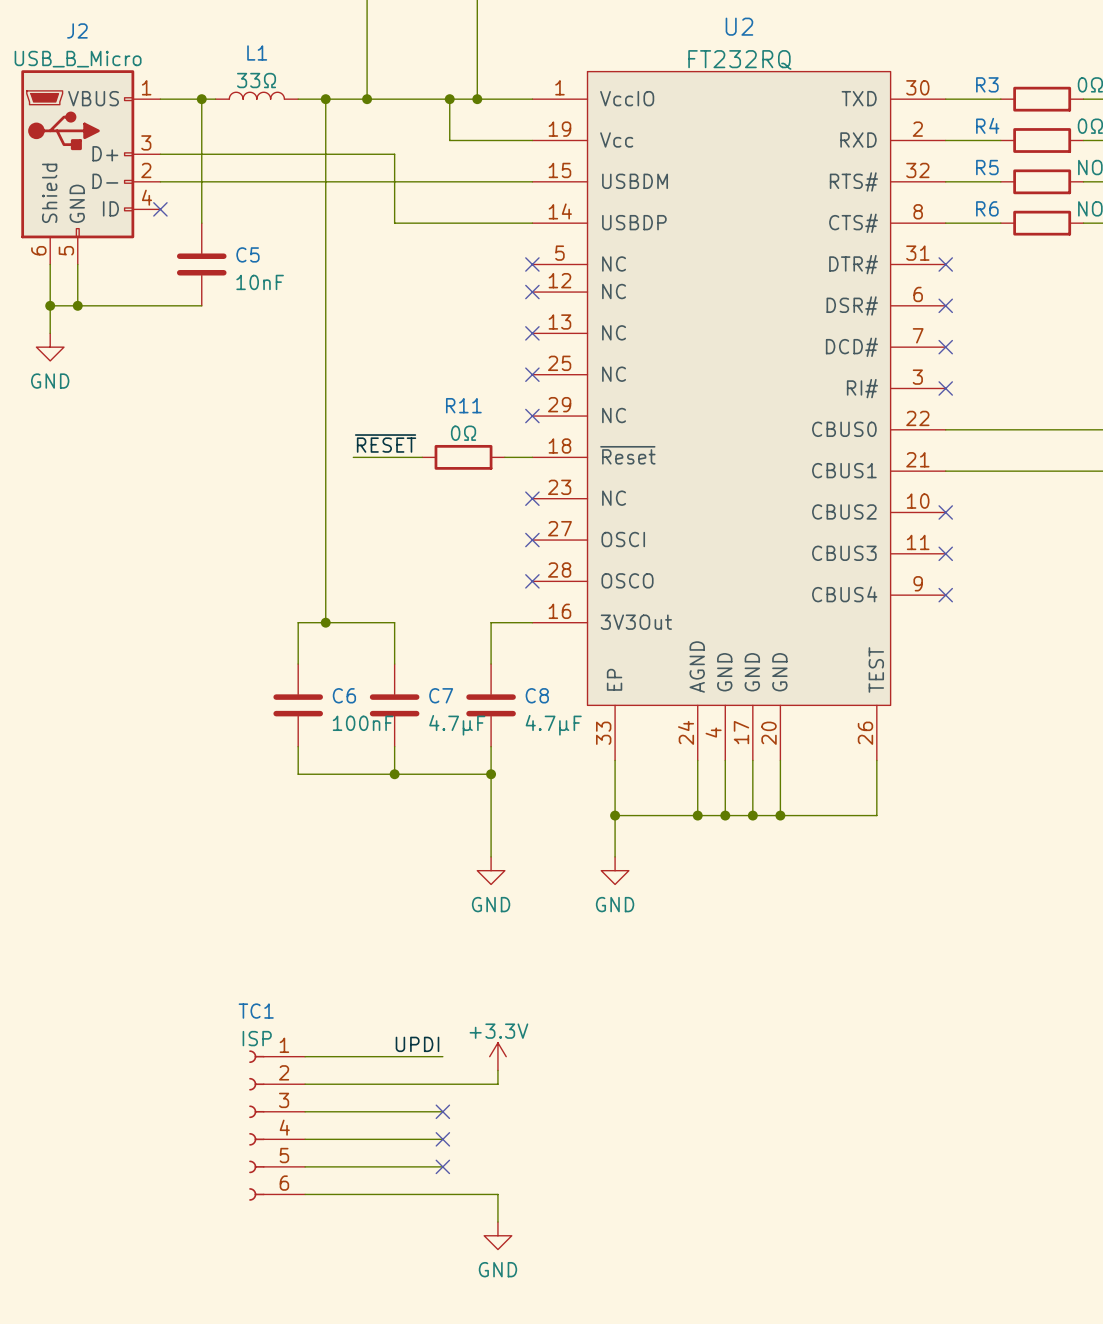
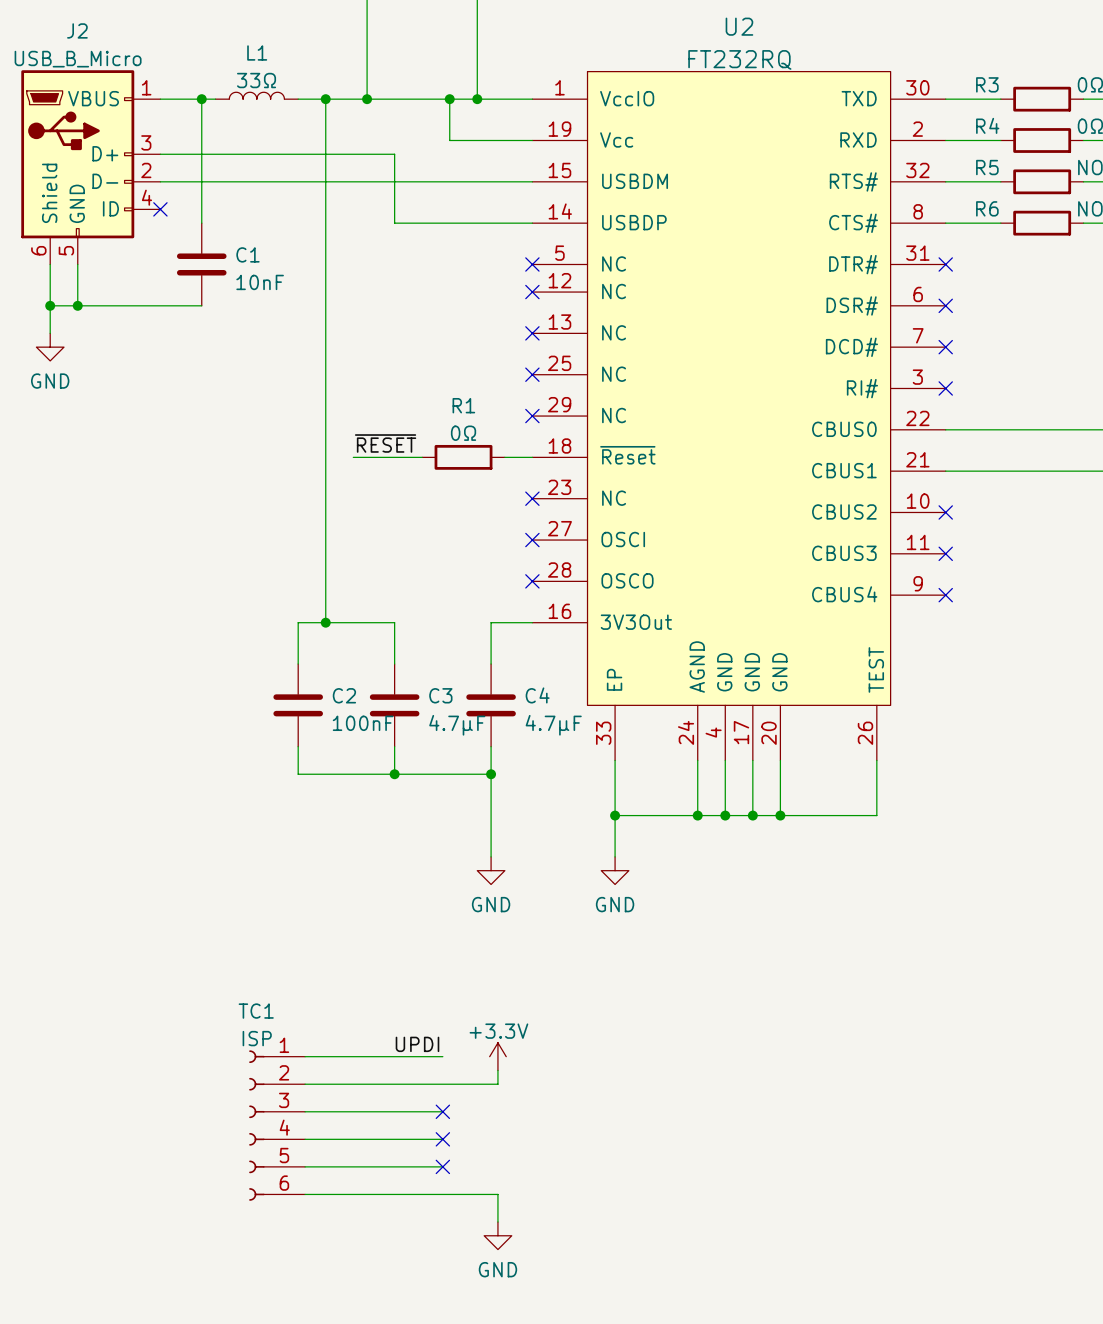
C5 name: C5 (247, 254) -> C1 (247, 254)
R11 name: R11 (463, 405) -> R1 (463, 405)
C6 name: C6 (344, 695) -> C2 (344, 695)
C7 name: C7 (441, 695) -> C3 (440, 695)
C8 name: C8 (537, 695) -> C4 (537, 695)

